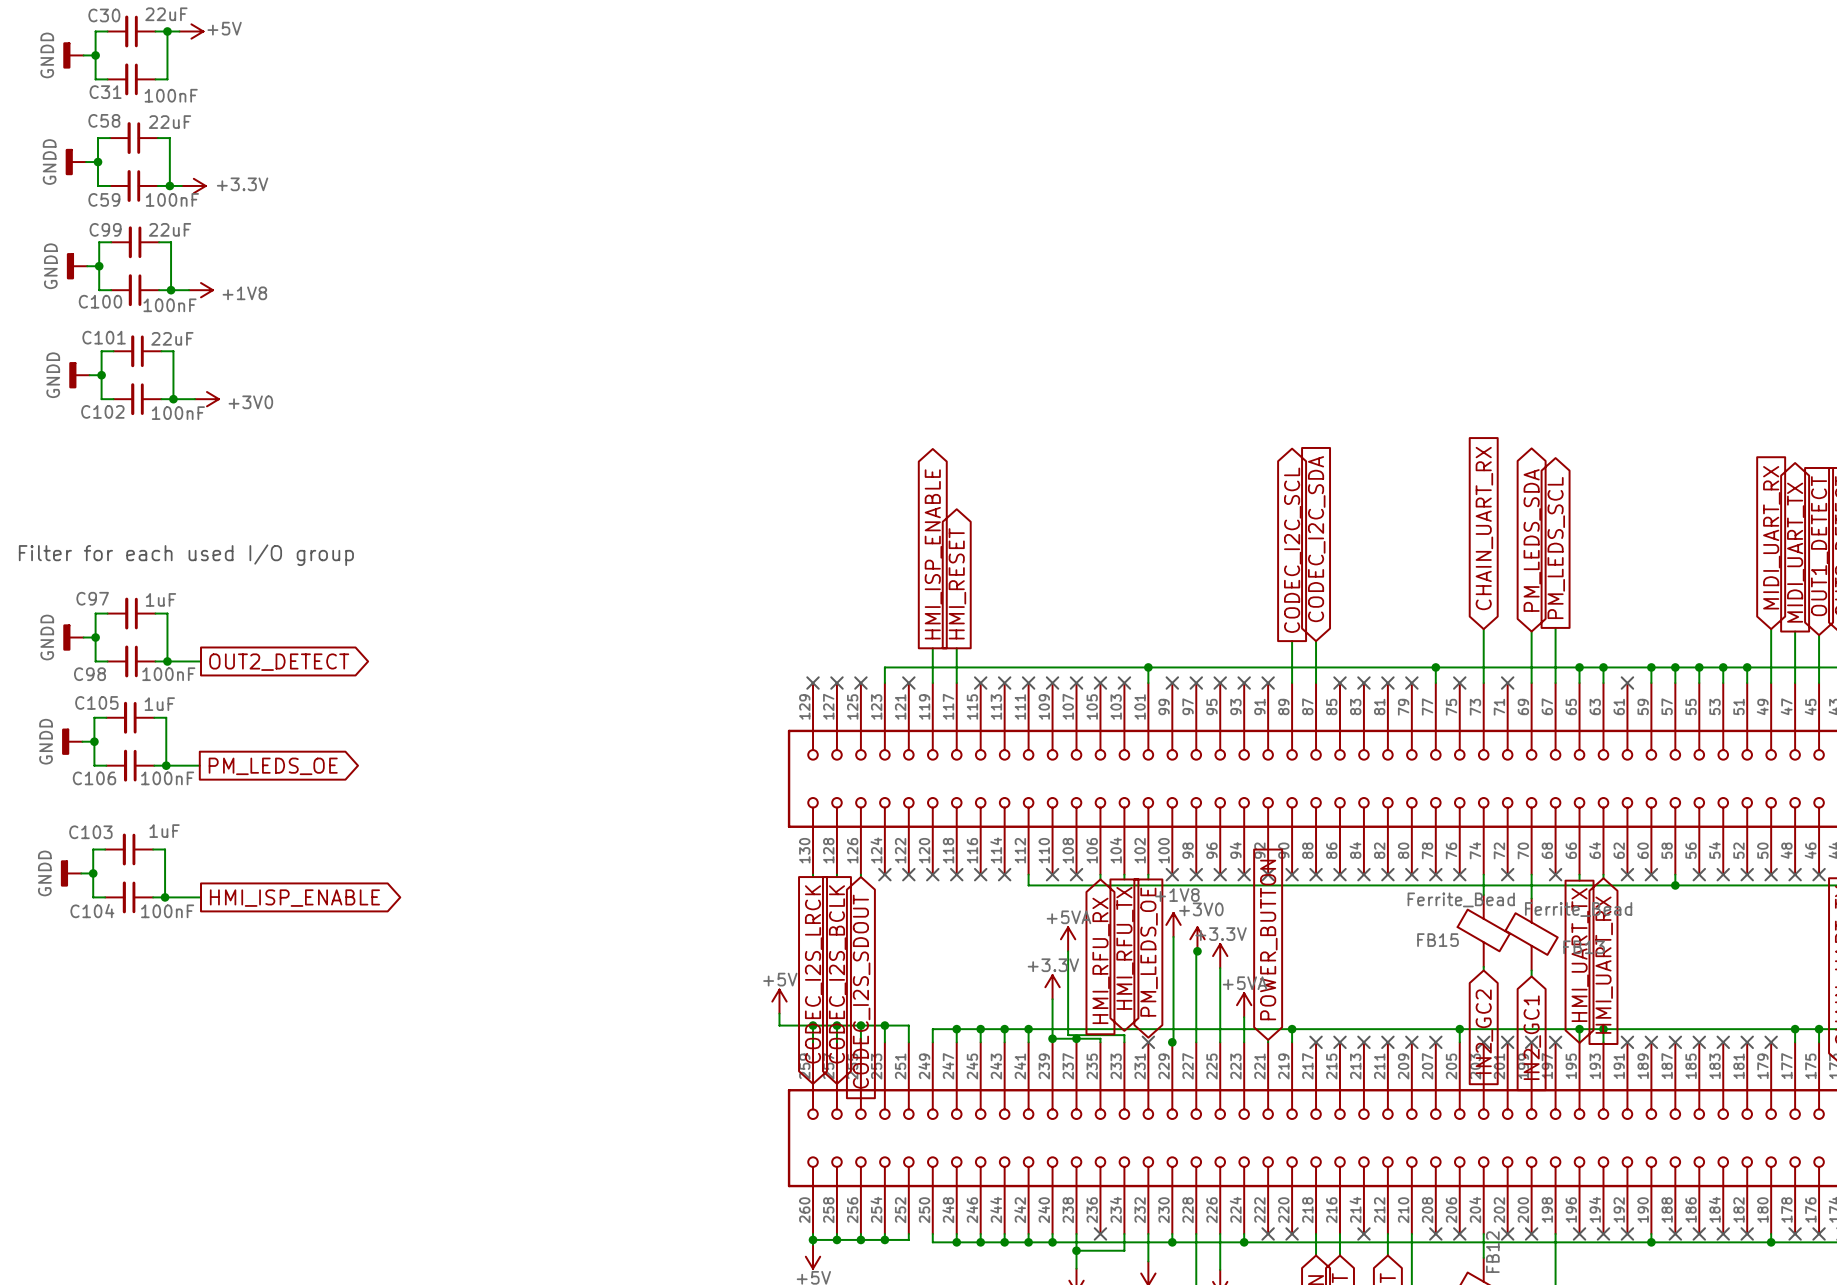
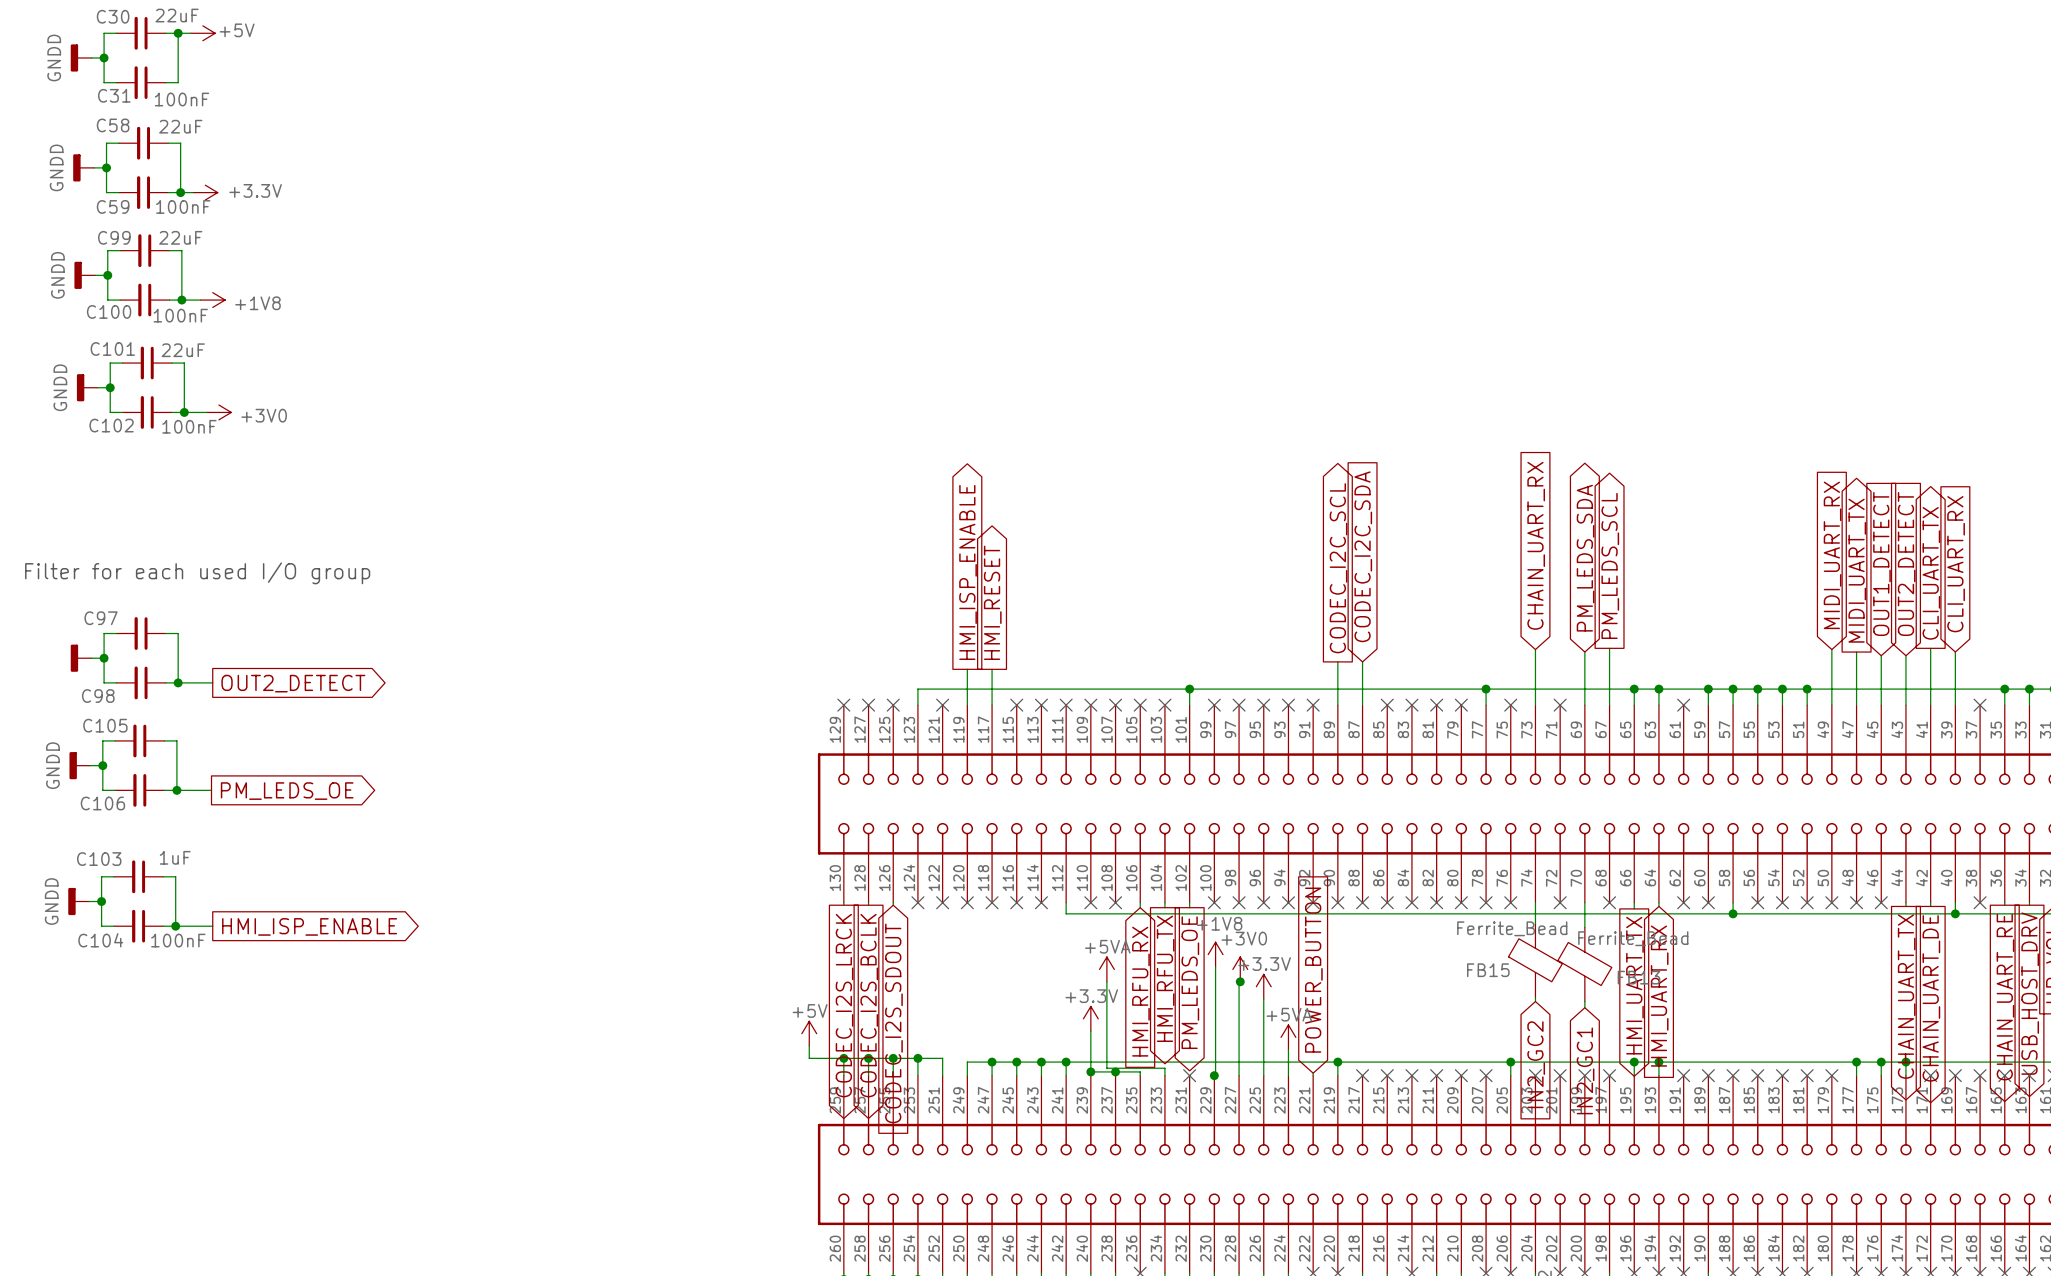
C97 value: 1uF (160, 599) -> none
power symbol text: GNDD (47, 637) -> none
C98 value: 100nF (168, 674) -> none
C105 value: 1uF (159, 704) -> none
C106 value: 100nF (167, 778) -> none

